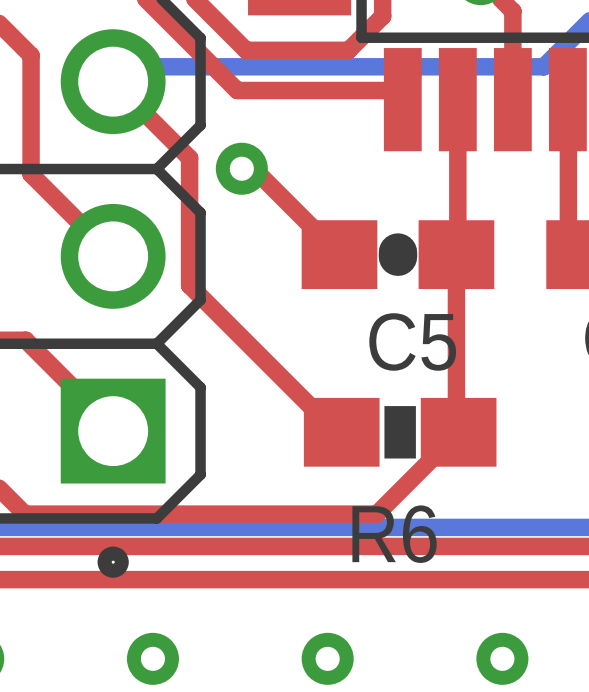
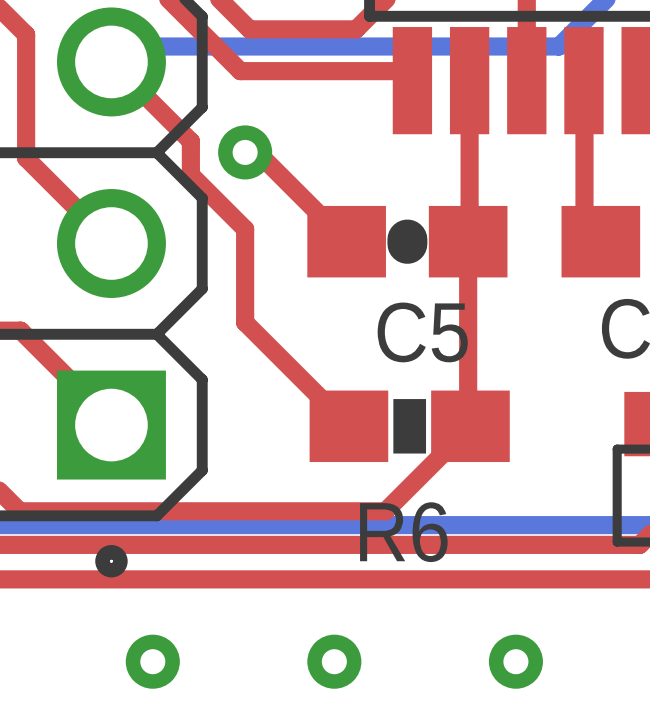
top track: (189, 190) (189, 285) (336, 432) (341, 432) -> (190, 174) (245, 229) (245, 322) (348, 426)

